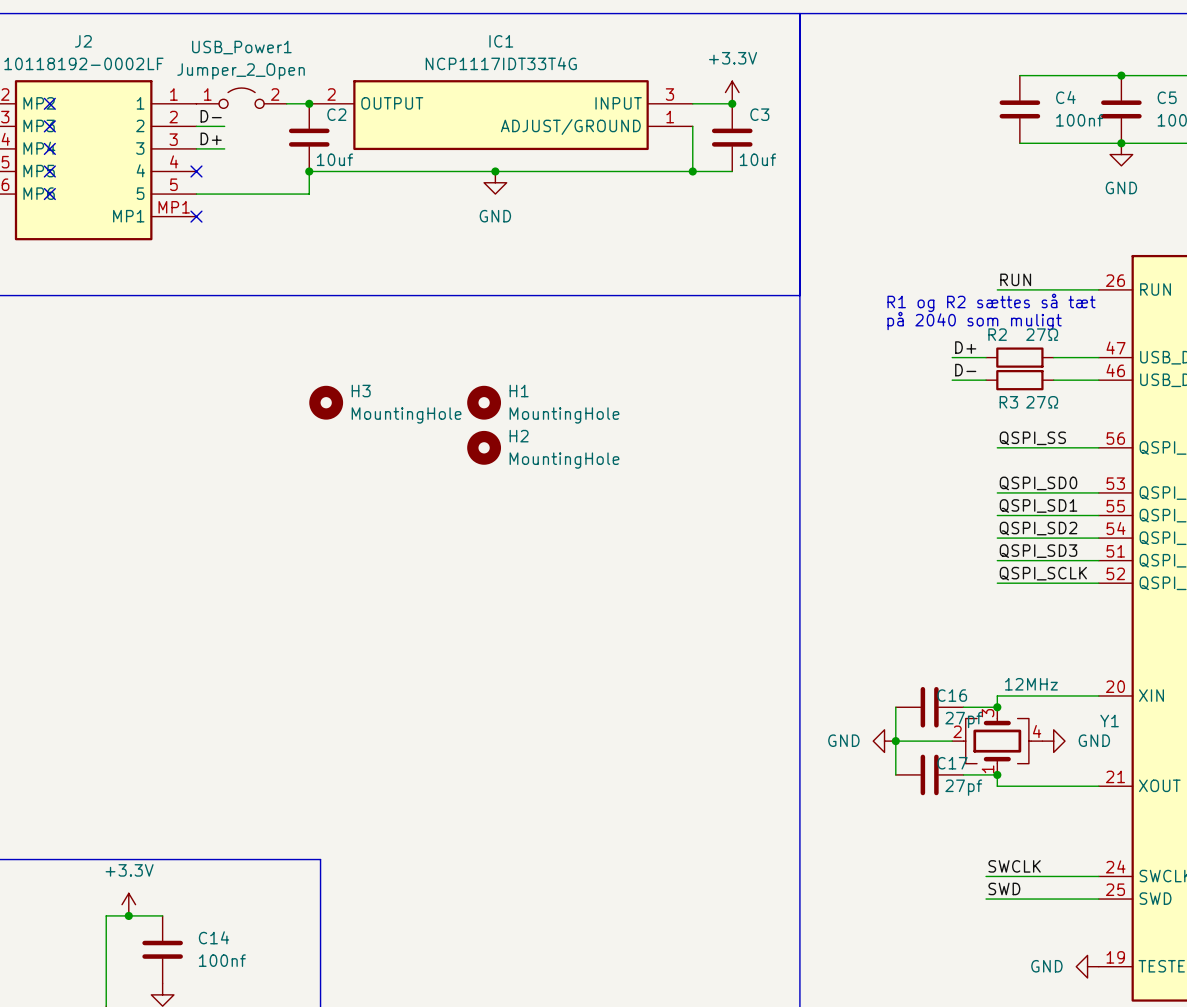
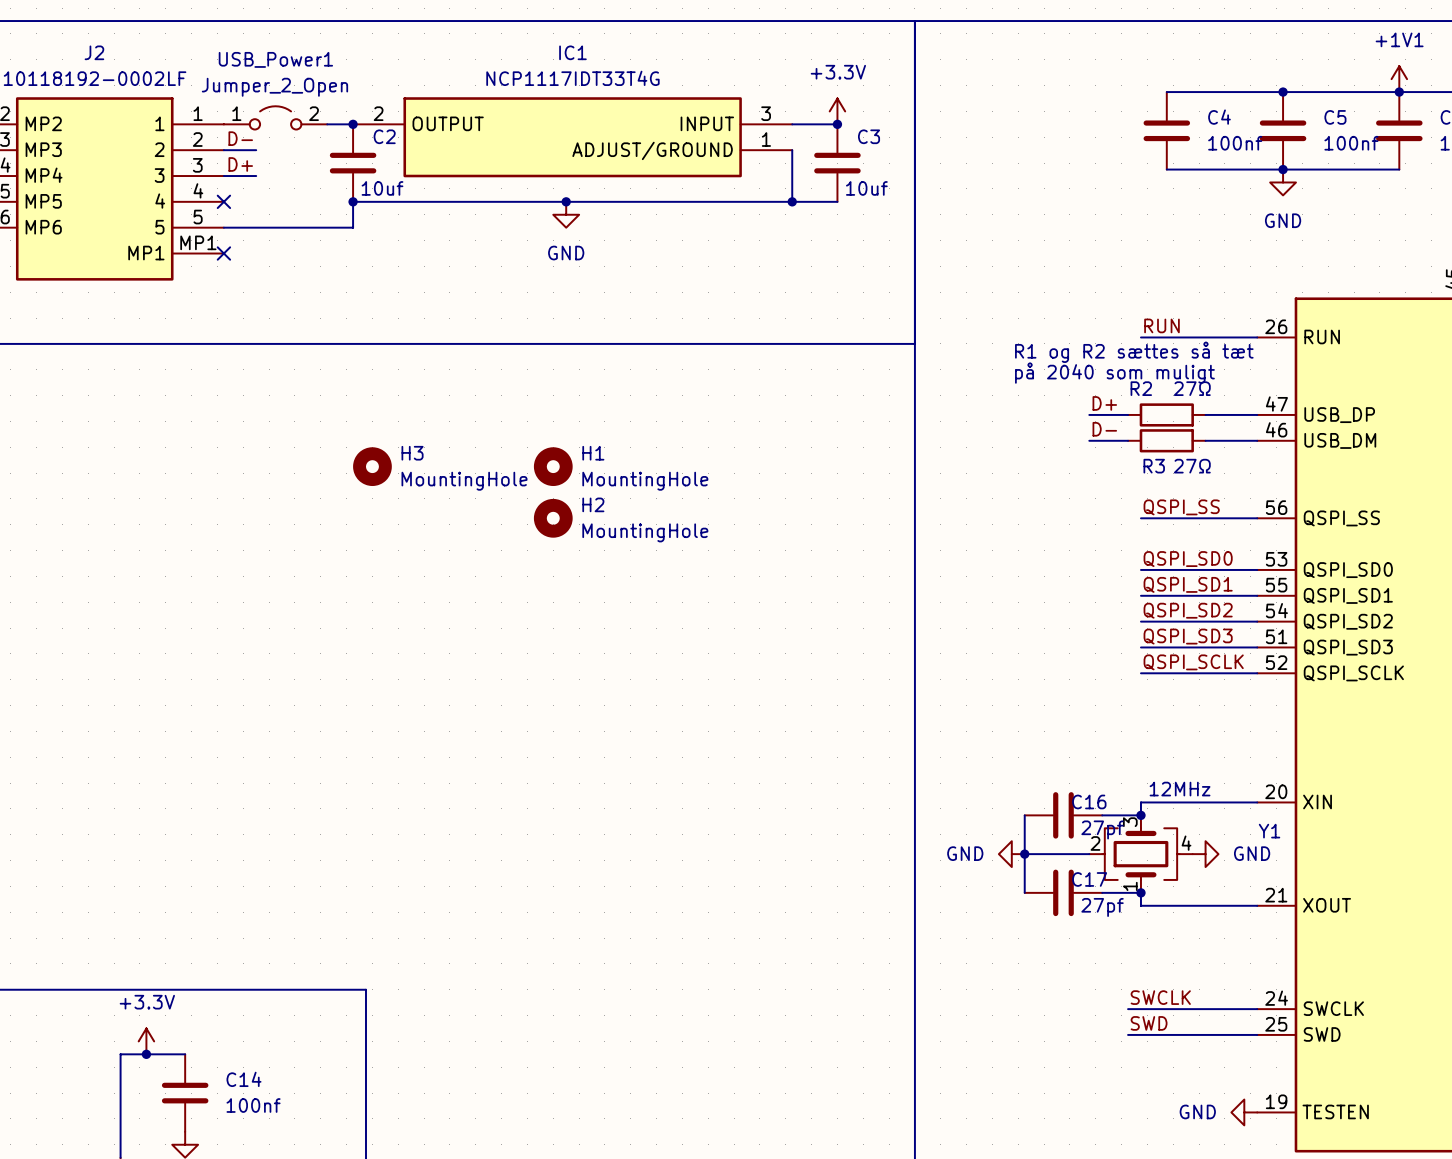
no-connect mark: (49, 103) -> none
no-connect mark: (49, 126) -> none
no-connect mark: (49, 148) -> none
no-connect mark: (49, 171) -> none
no-connect mark: (49, 194) -> none

